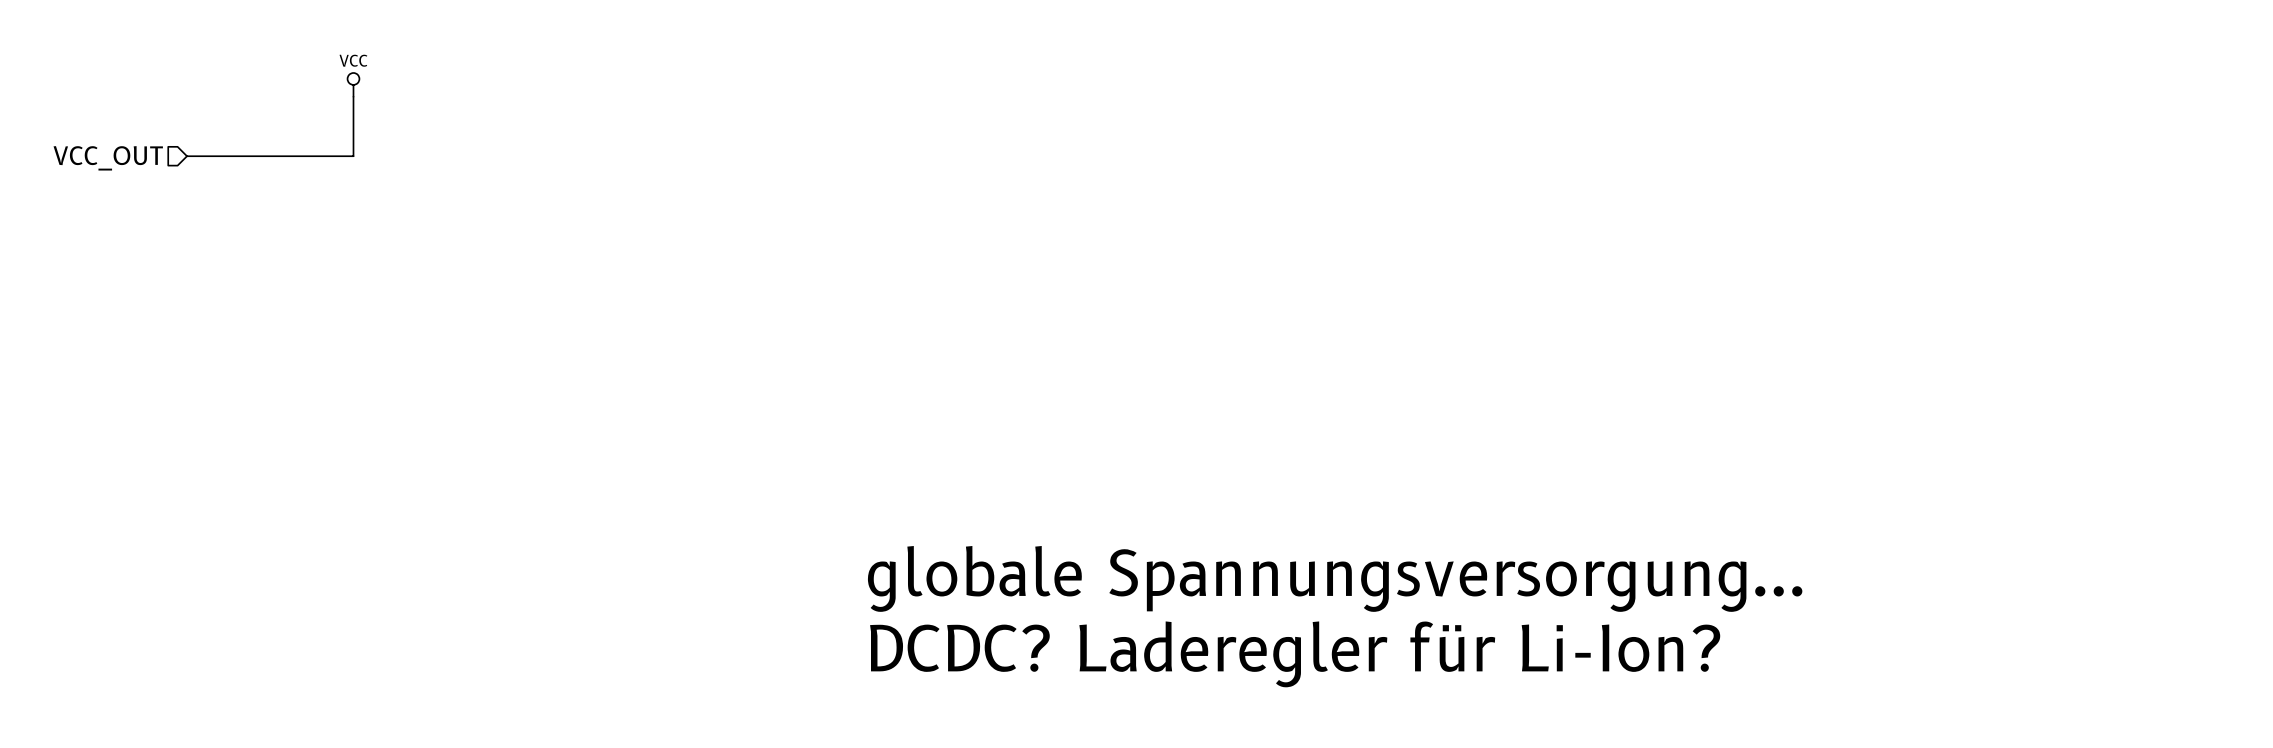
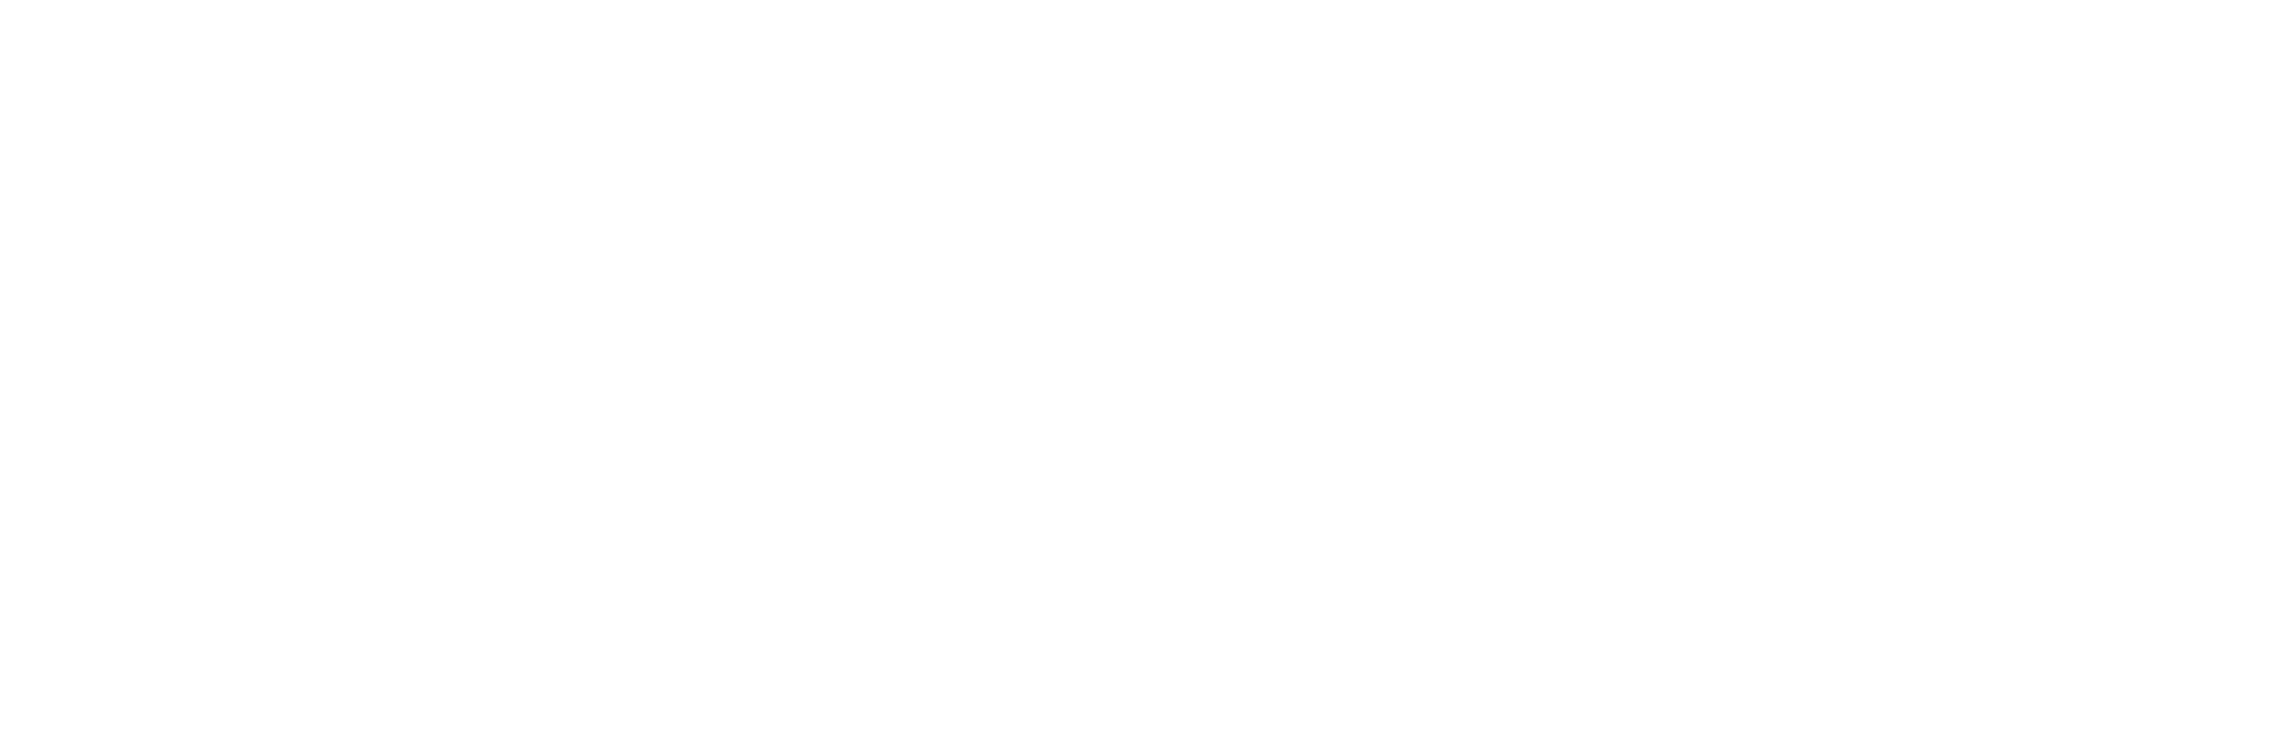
power symbol: VCC (353, 84) -> none
wire: (353, 96) (353, 156) (187, 156) -> none
hierarchical label: VCC_OUT (108, 158) -> none
text: globale Spannungsversorgung... (1335, 578) -> none
text: DCDC? Laderegler für Li-Ion? (1295, 654) -> none

